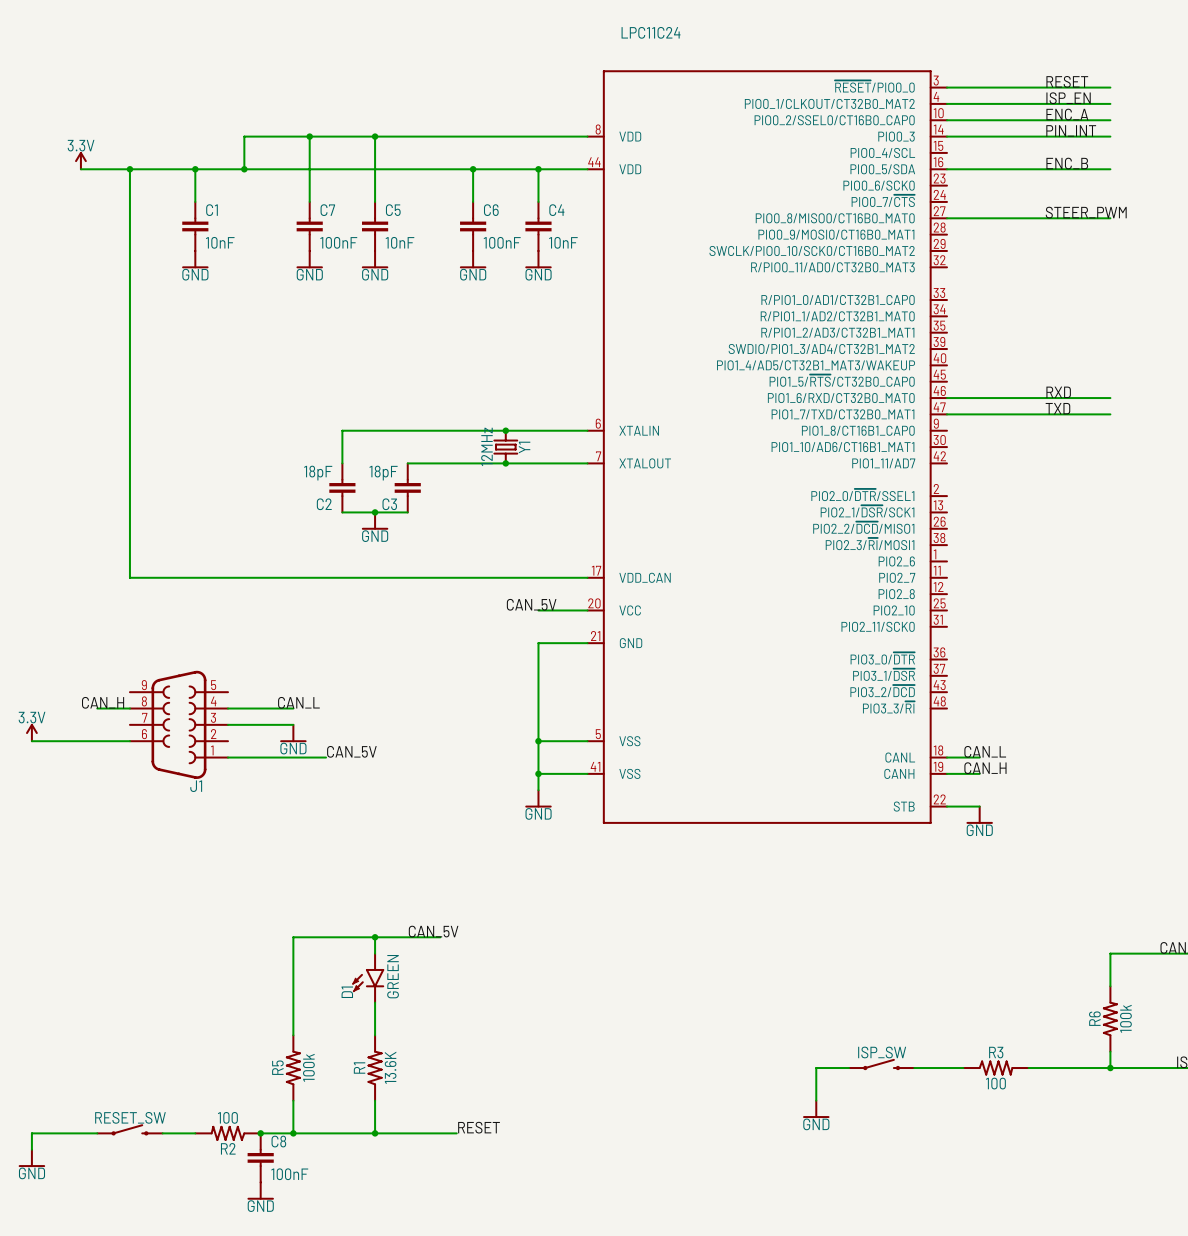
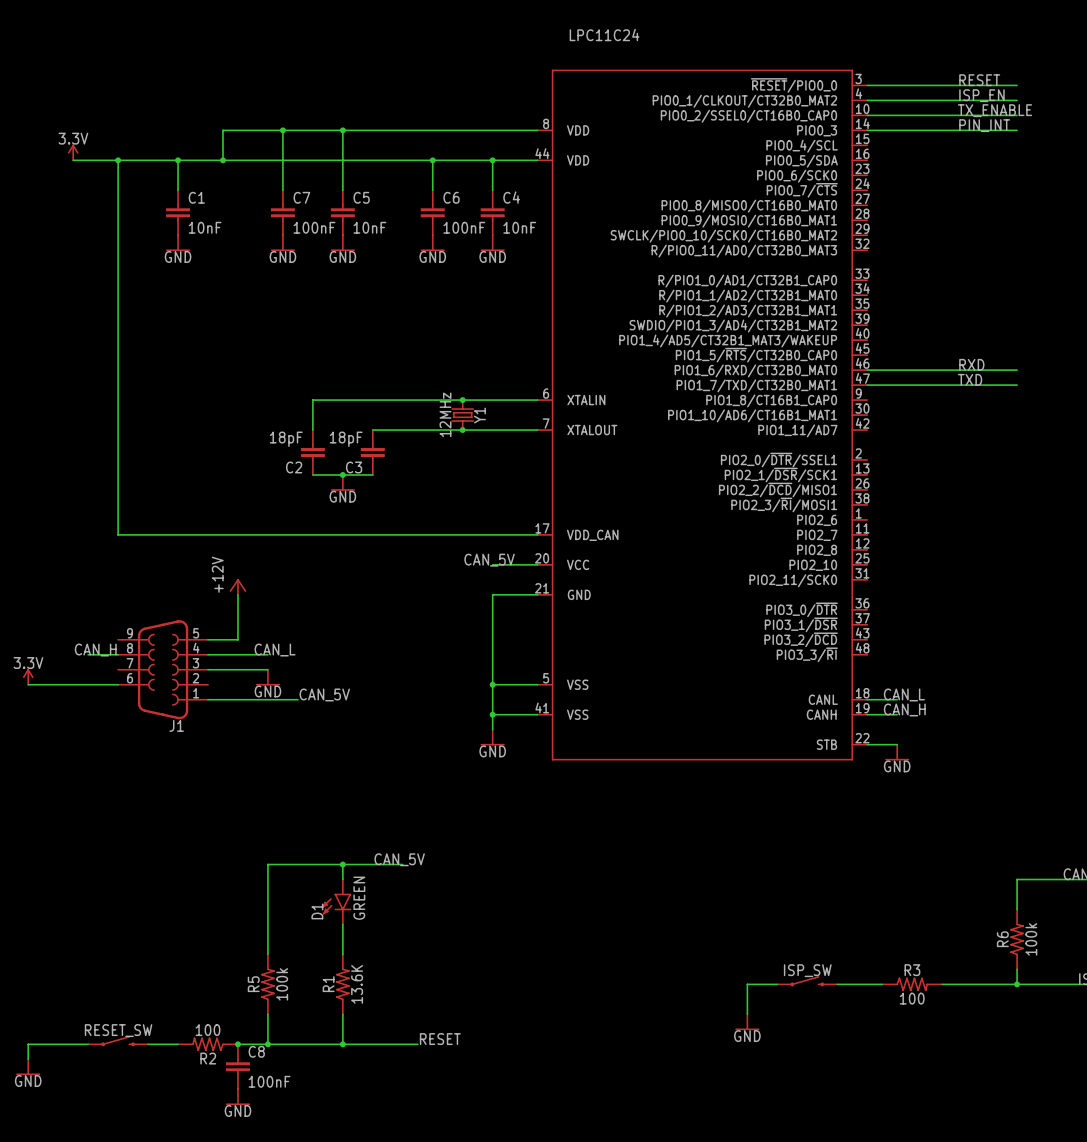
label: ENC_A (1067, 114) -> TX_ENABLE (995, 110)
label: ENC_B (1067, 163) -> none
wire: (946, 169) (1110, 169) -> none
label: STEER_PWM (1086, 212) -> none
wire: (946, 218) (1110, 218) -> none
power symbol: none -> +12V (237, 586)
wire: none -> (237, 594) (237, 639) (208, 639)

